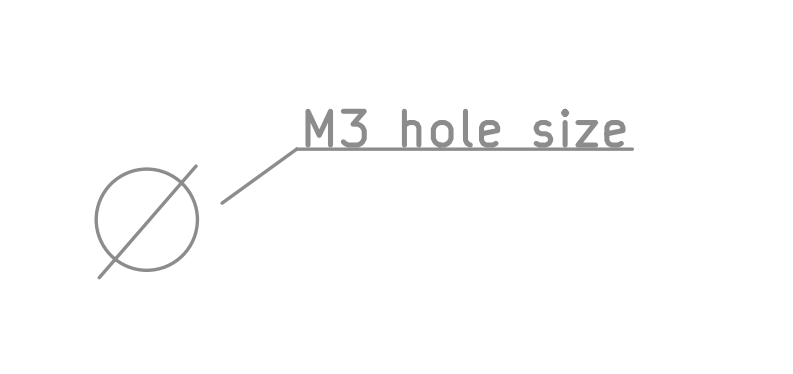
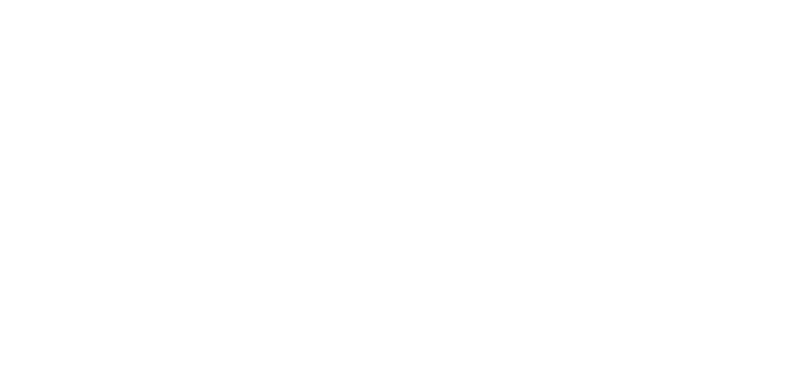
text: M3 hole size (465, 128) -> none
line: (632, 149) (296, 149) (222, 203) -> none
line: (196, 166) (99, 277) -> none
drawing: [94, 167, 200, 273] -> none

